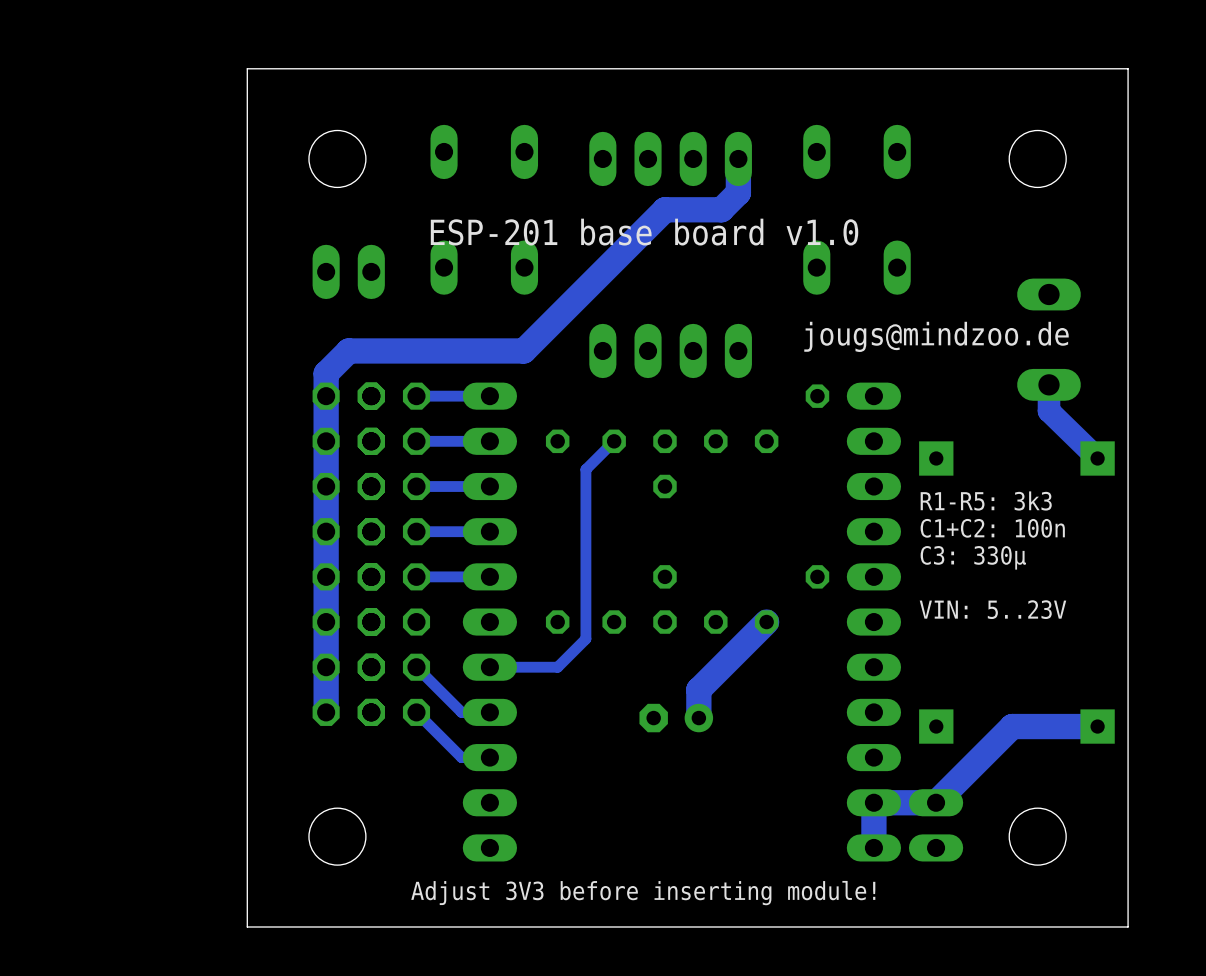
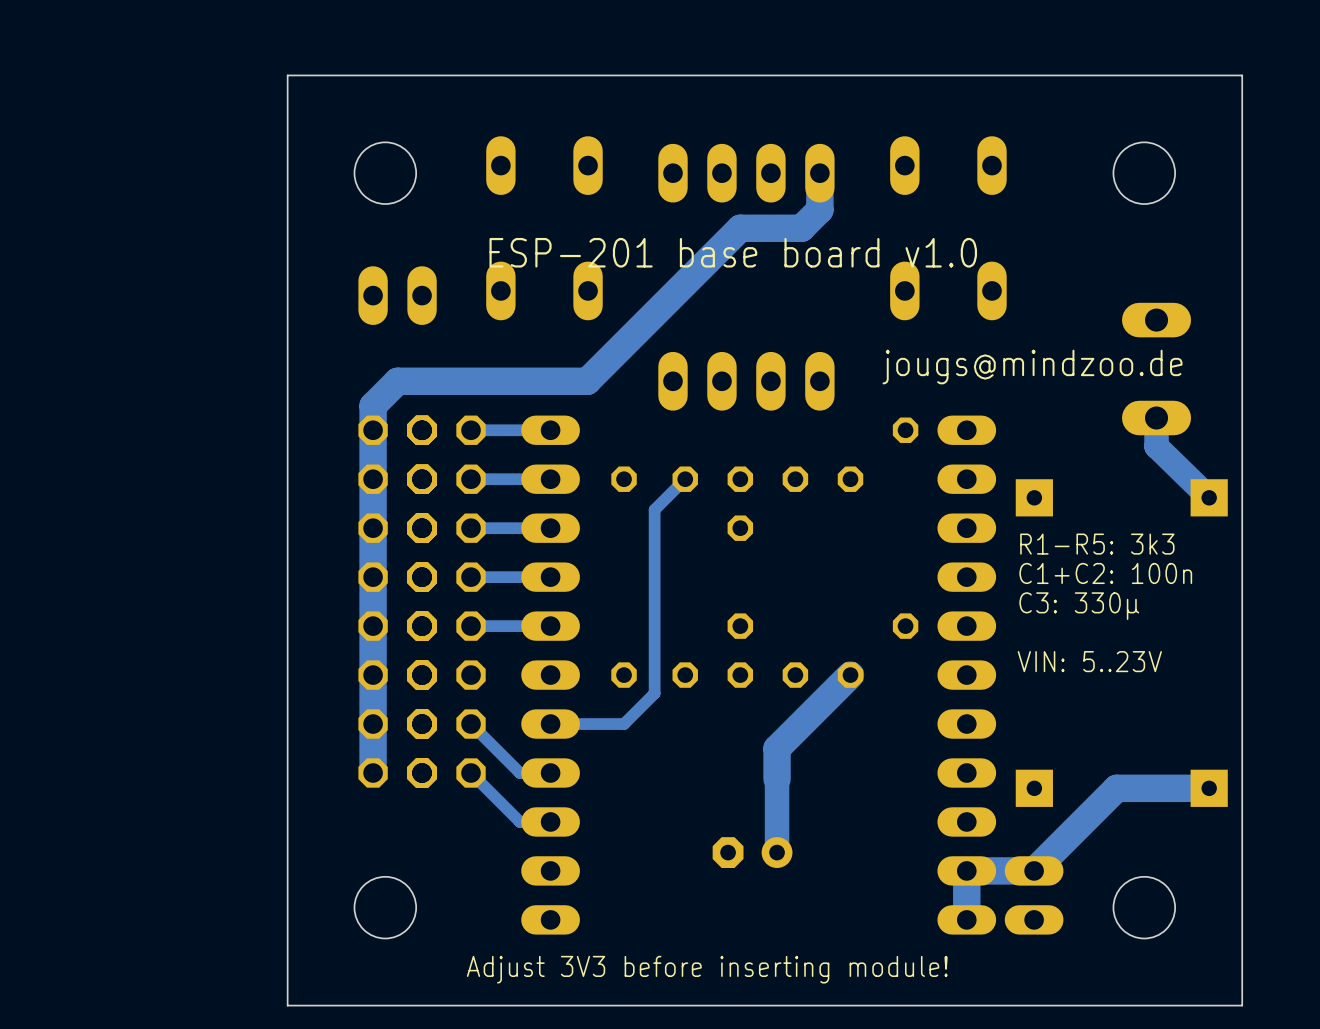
part position: (676, 718) -> (752, 852)
track: none -> (777, 779) (777, 852)

